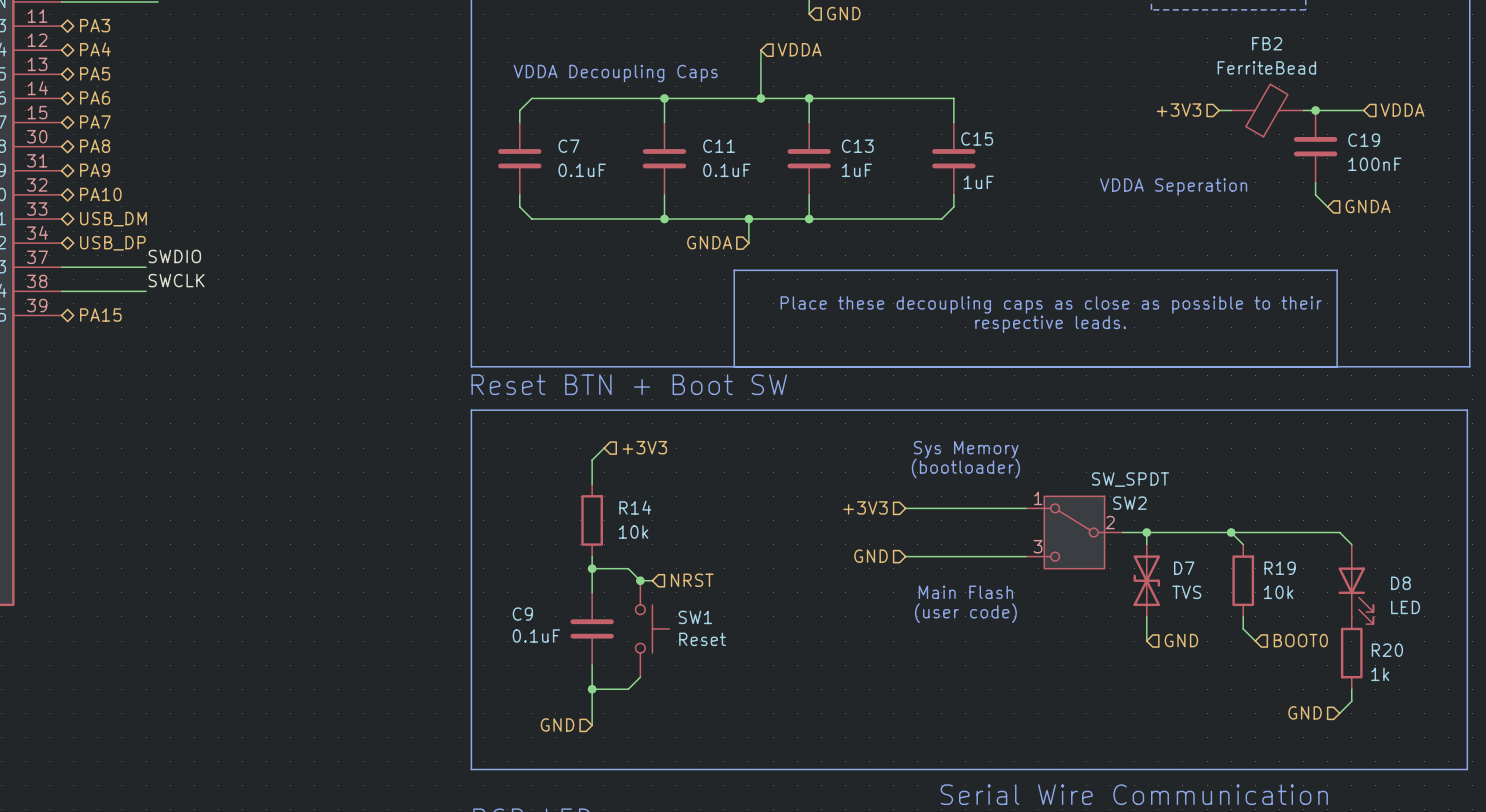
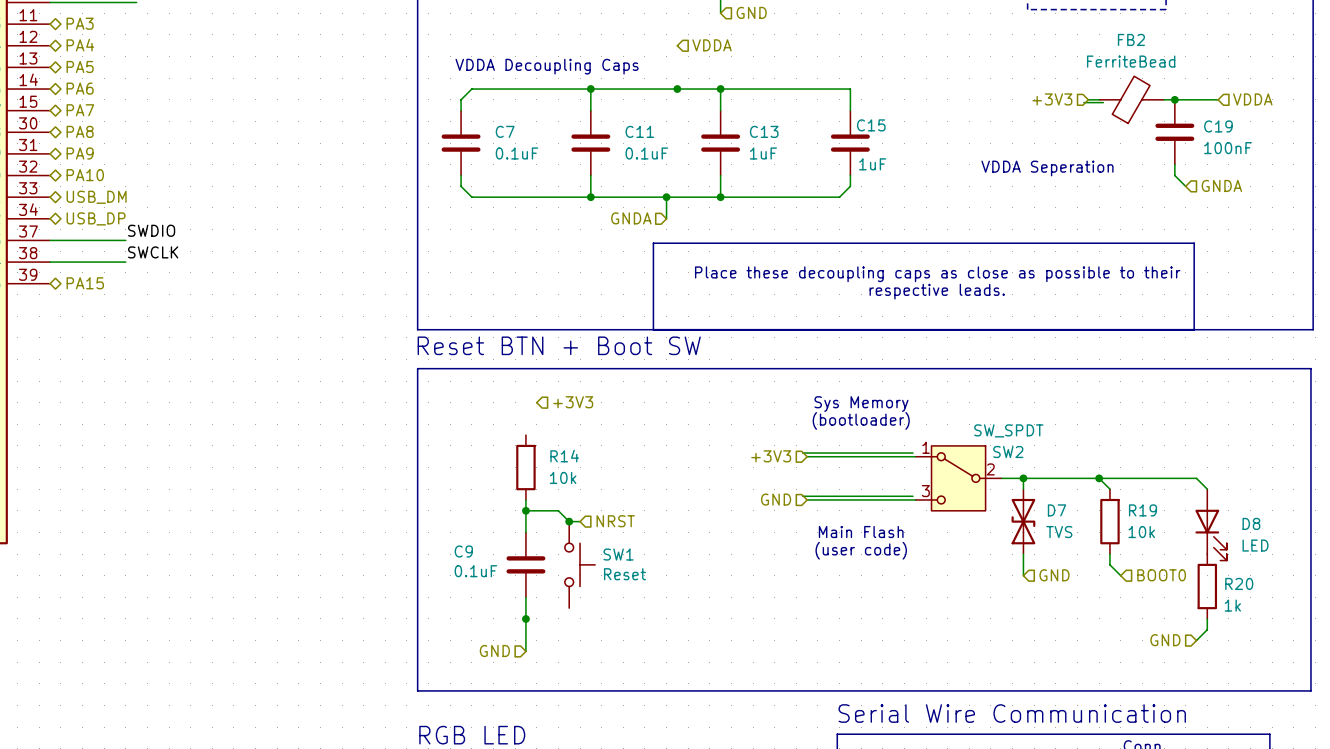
wire: (760, 50) (760, 98) -> none
wire: none -> (1083, 102) (1103, 102)
wire: (604, 448) (592, 460) (592, 484) -> none
wire: none -> (802, 453) (912, 453)
wire: none -> (802, 496) (912, 496)
wire: (640, 677) (628, 689) (592, 689) -> none

